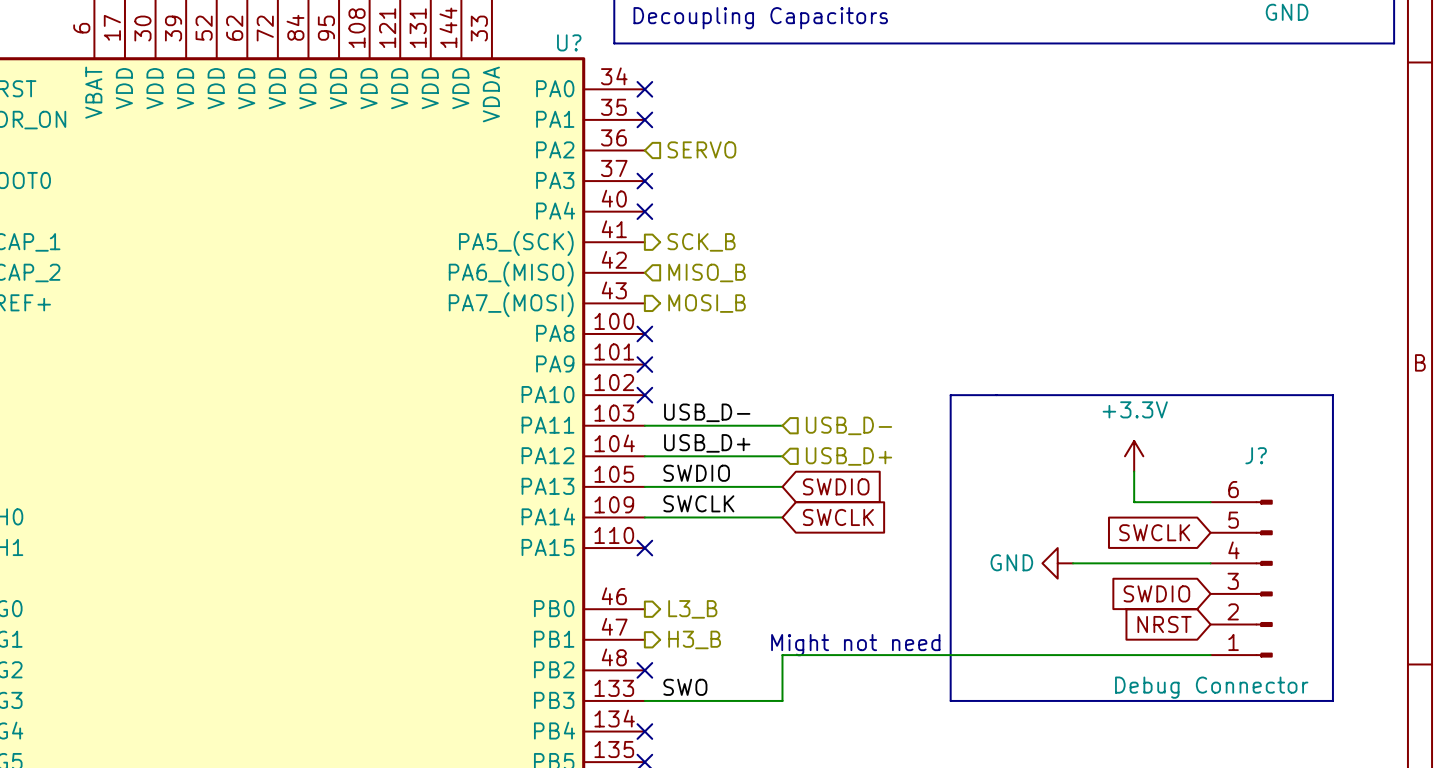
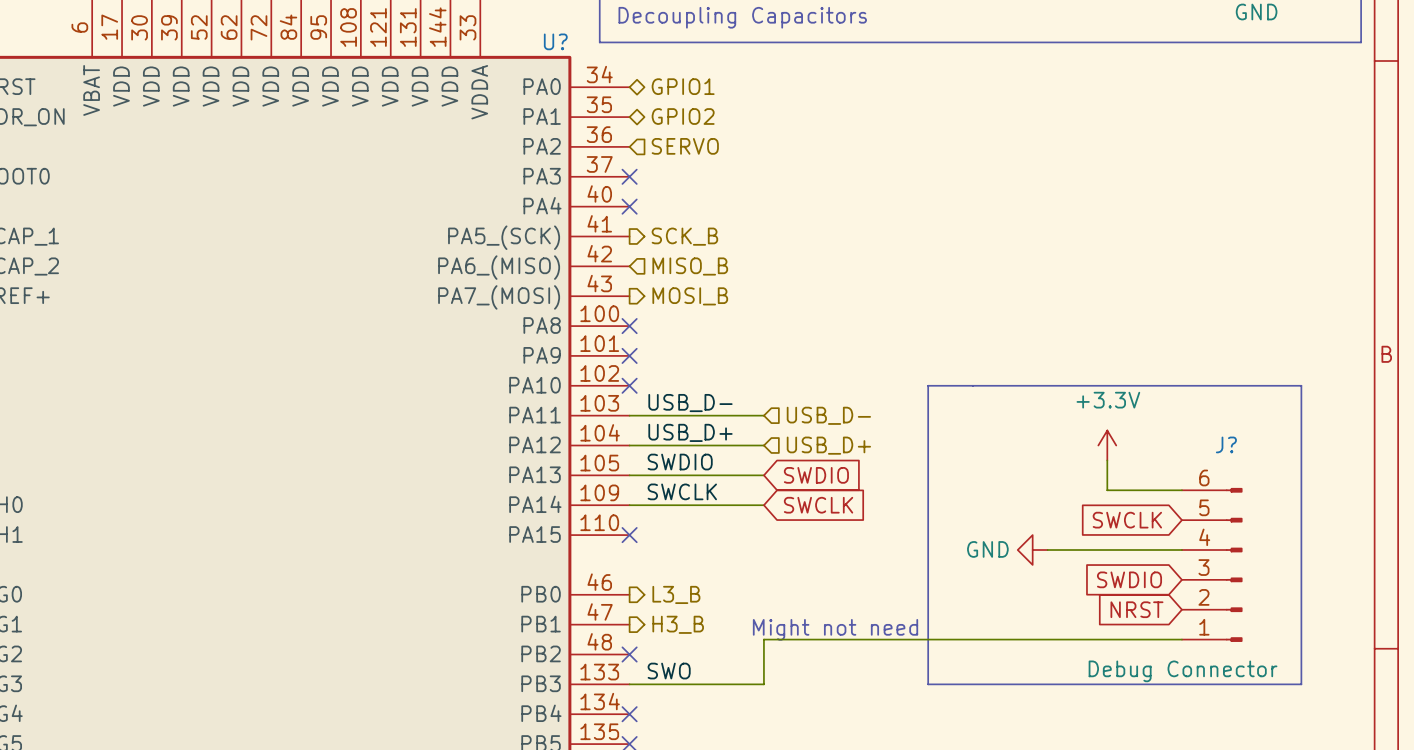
hierarchical label: none -> GPIO1 (683, 86)
no-connect mark: (644, 89) -> none
no-connect mark: (644, 119) -> none
hierarchical label: none -> GPIO2 (683, 116)

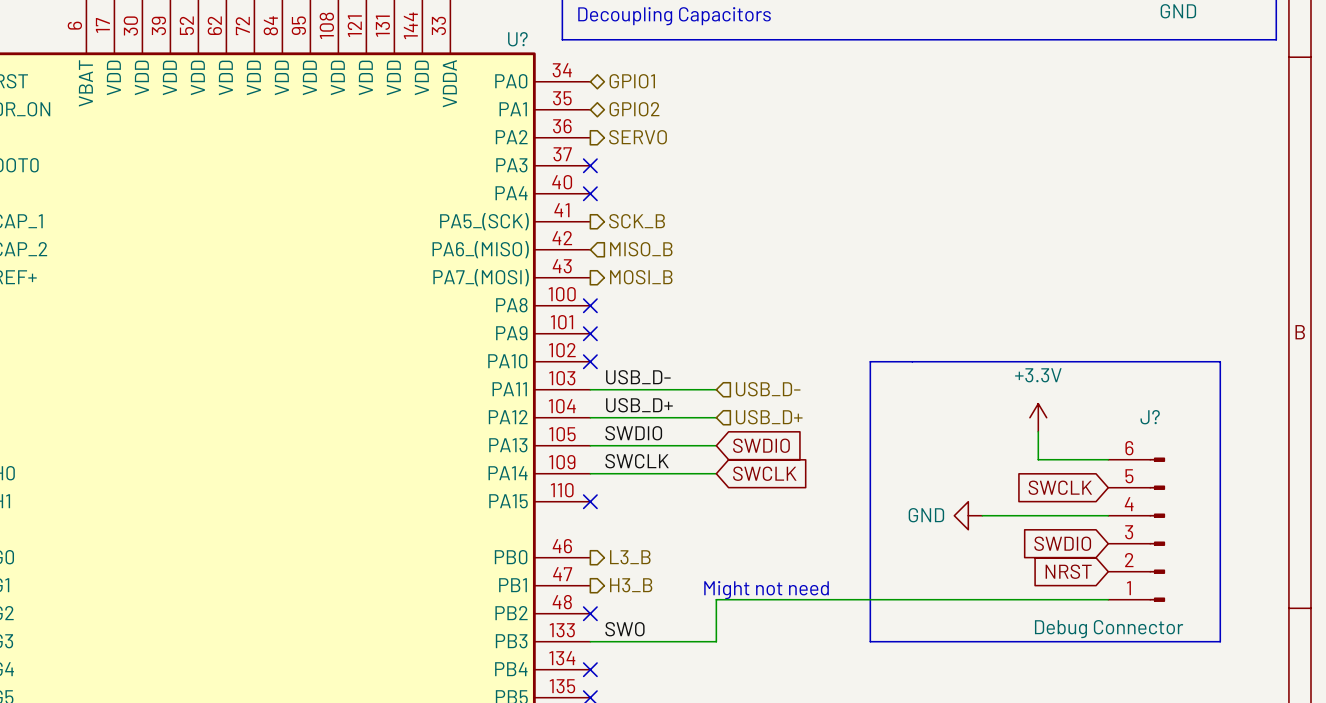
hierarchical label shape: input (685, 146) -> output (638, 137)

